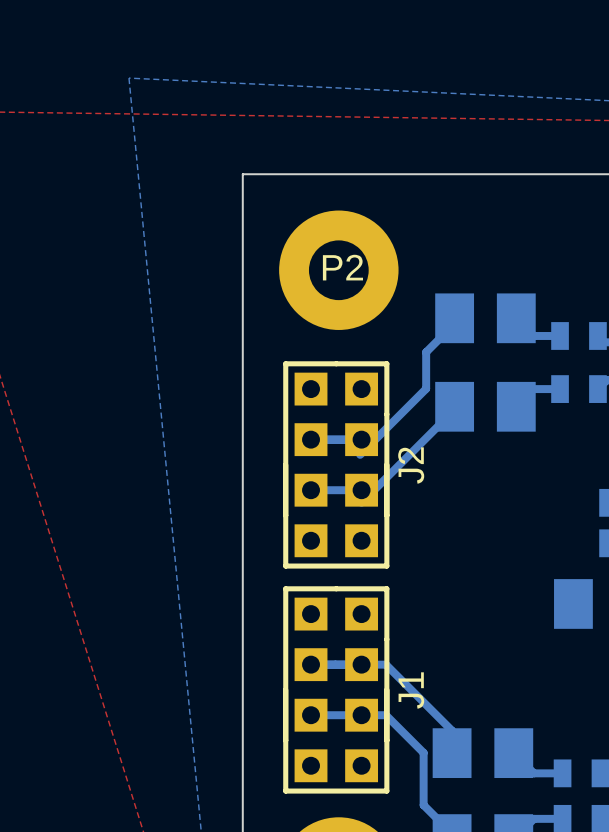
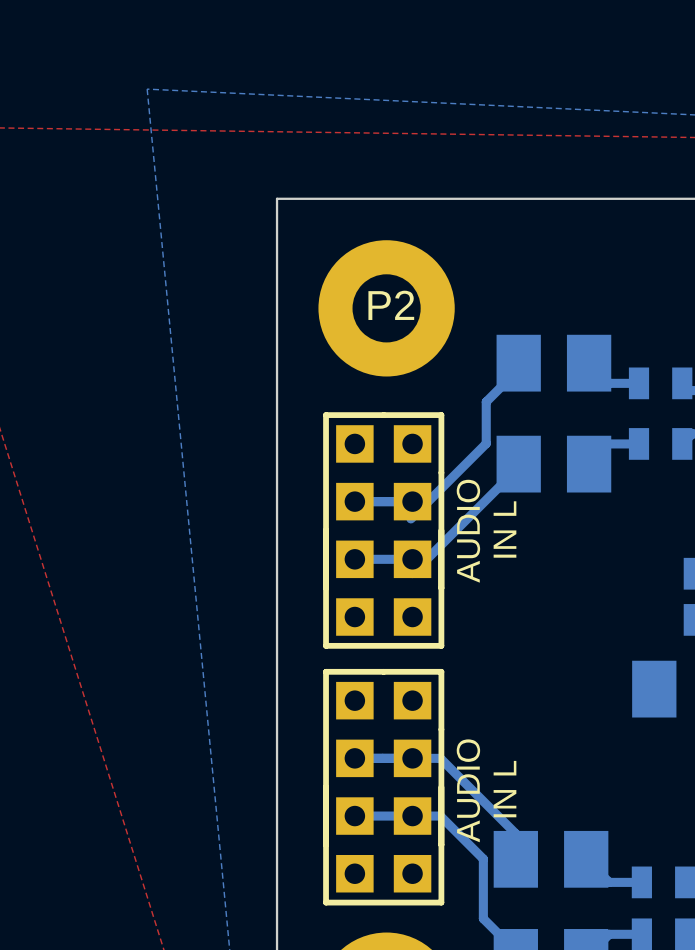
text: none -> IN L (504, 529)
text: none -> AUDIO (468, 531)
J2 name: J2 (411, 465) -> none
J1 name: J1 (411, 690) -> none
text: none -> IN L (504, 789)
text: none -> AUDIO (468, 790)

